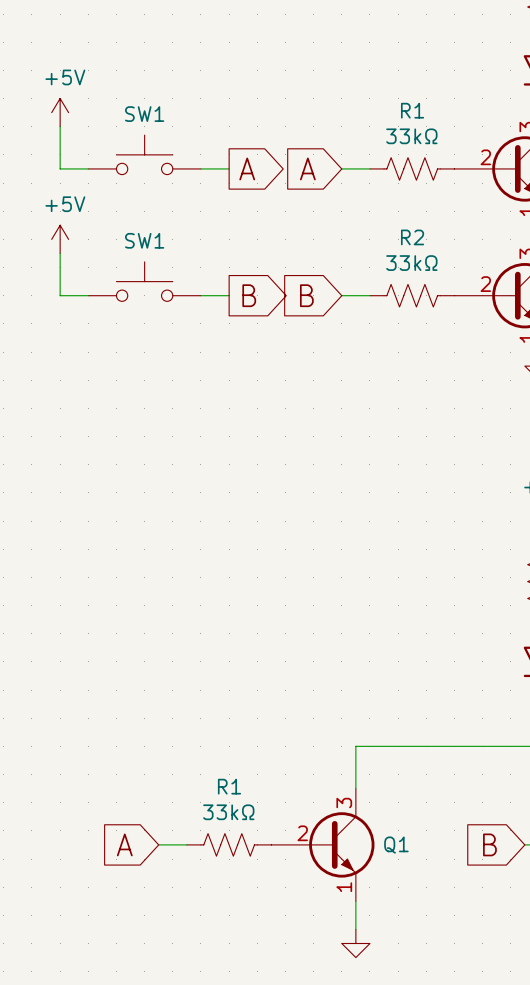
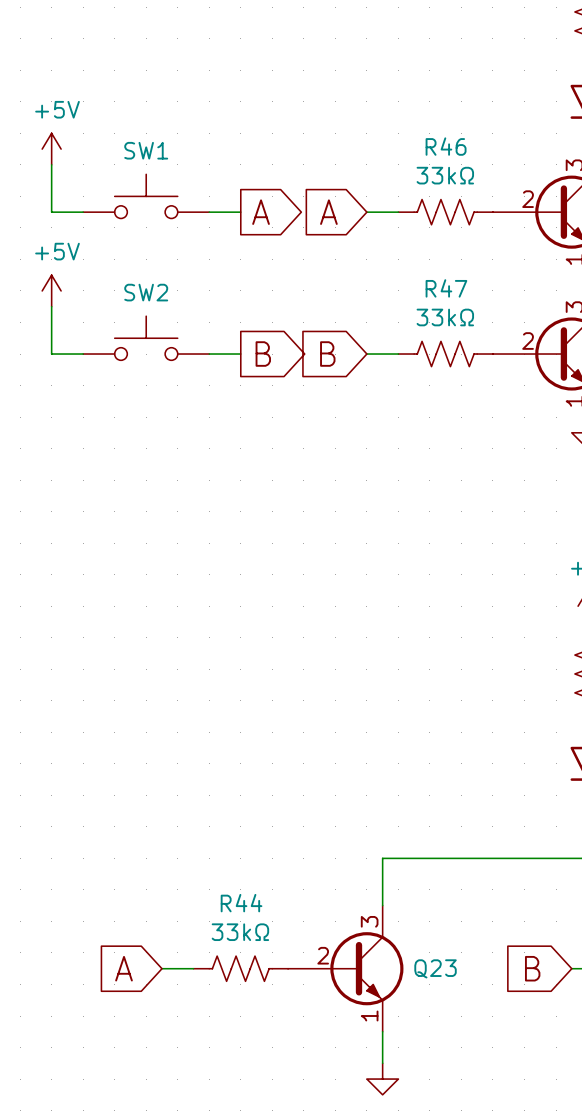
R1 name: R1 (412, 110) -> R46 (446, 146)
R2 name: R2 (412, 237) -> R47 (446, 288)
SW1 name: SW1 (144, 240) -> SW2 (146, 292)
R1 name: R1 (229, 786) -> R44 (241, 903)
Q1 name: Q1 (396, 845) -> Q23 (435, 968)

